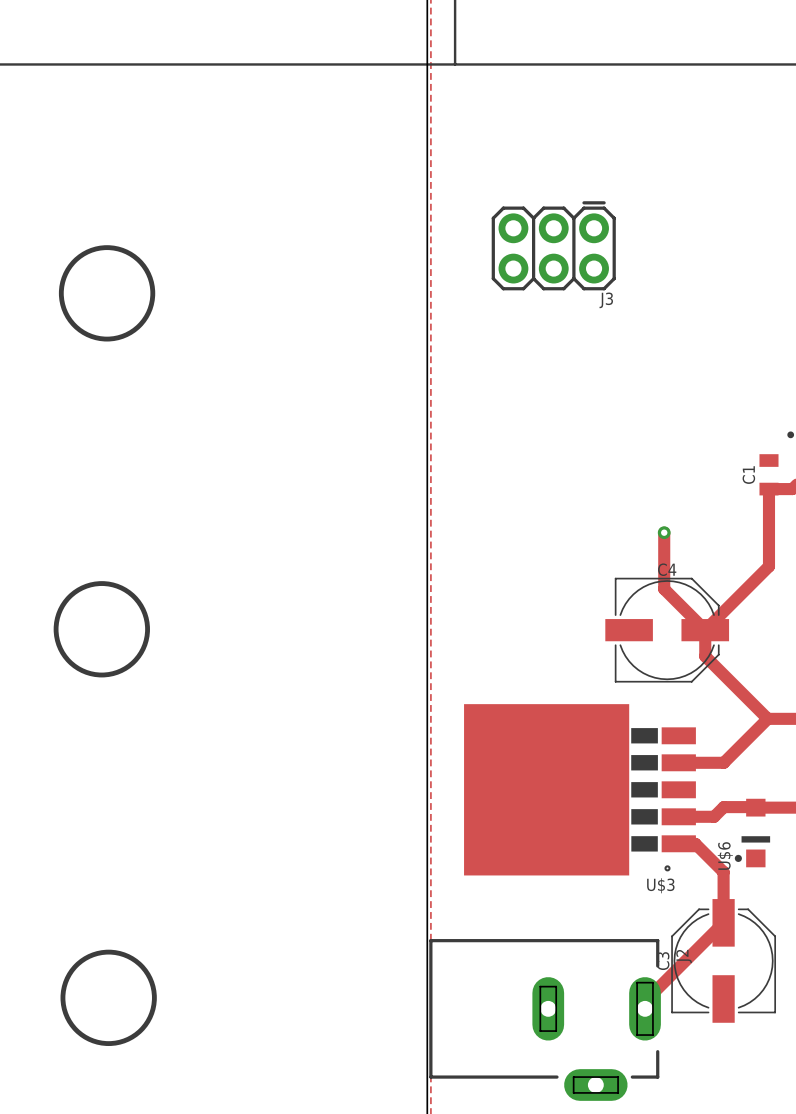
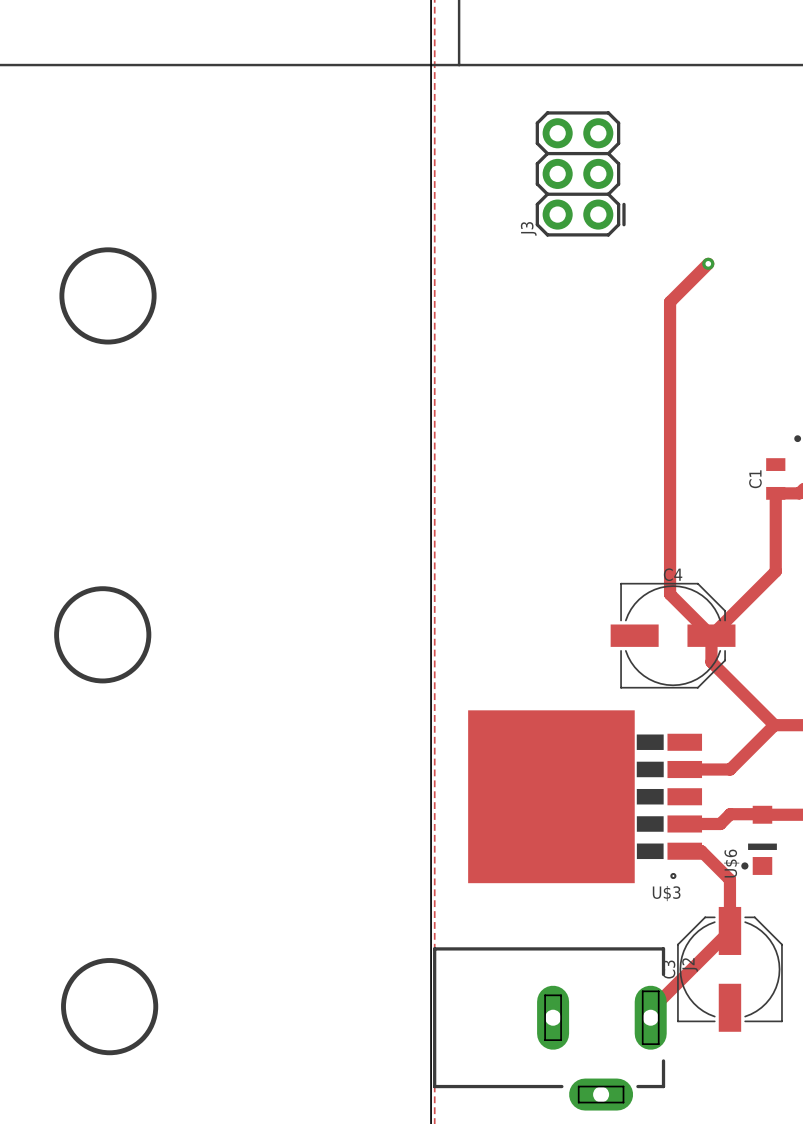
J3 rotation: 0° (553, 245) -> 90° clockwise (580, 173)
J3 position: (553, 245) -> (580, 173)
track: none -> (708, 263) (670, 302) (670, 537)
via: none -> (708, 263)
via: (664, 532) -> none

